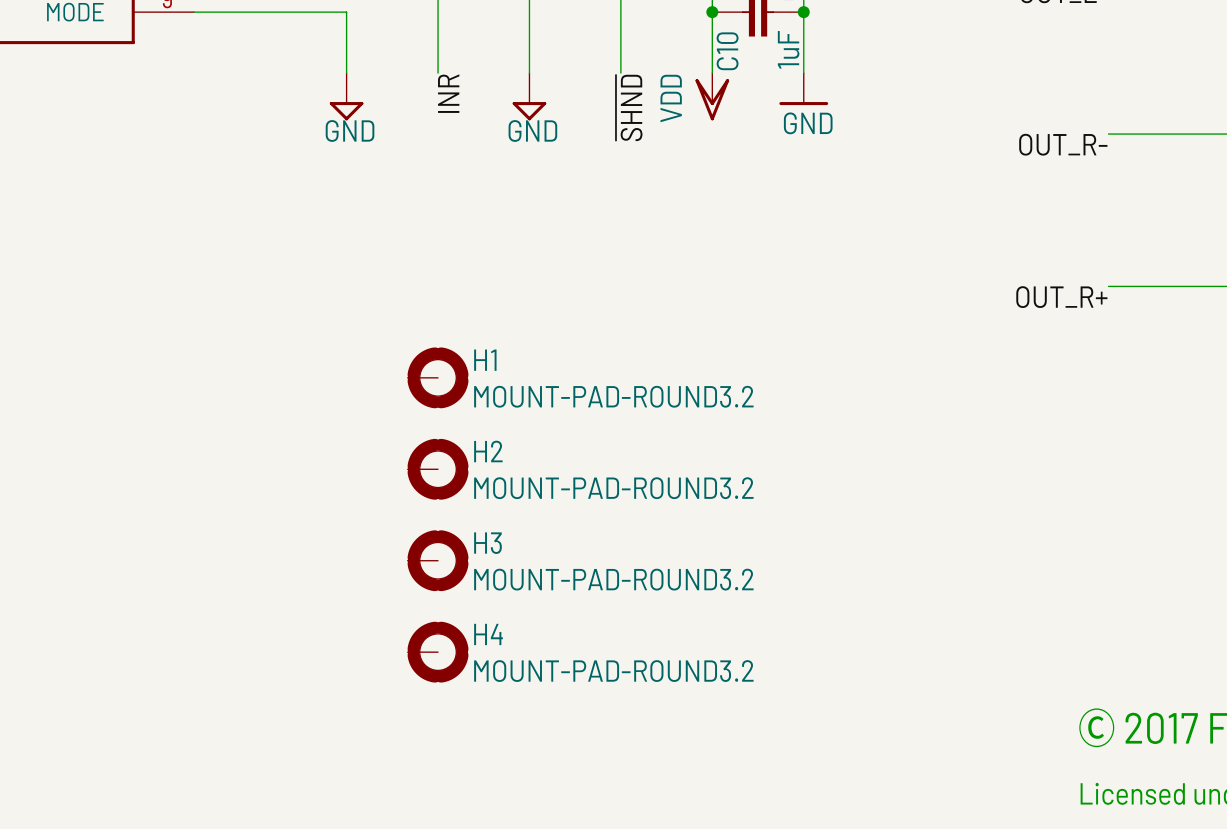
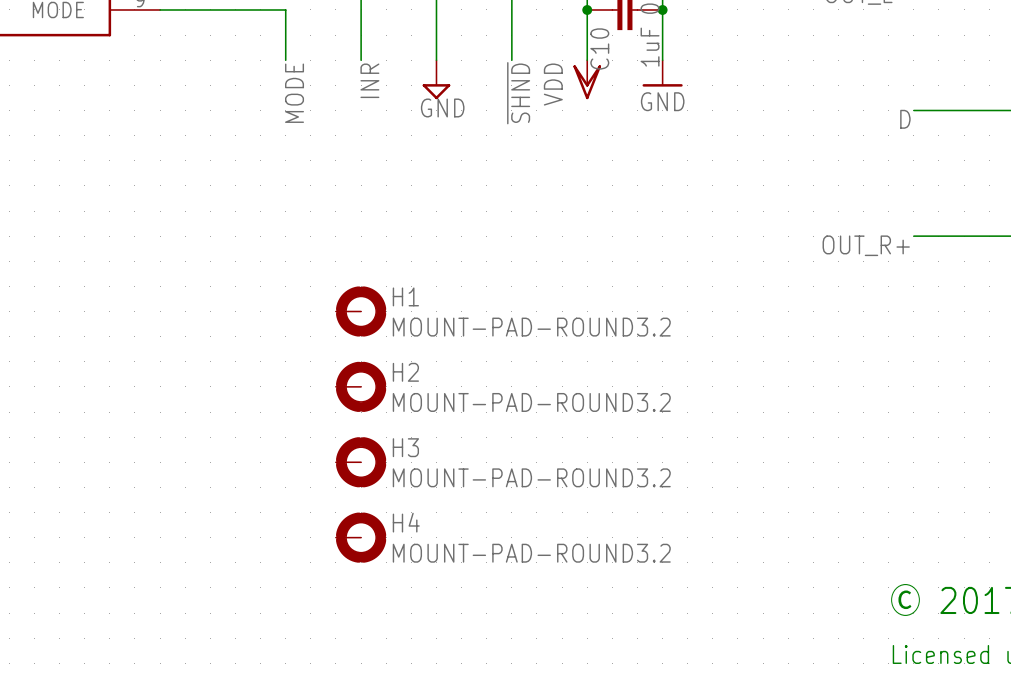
power symbol: GND (346, 96) -> none
label: none -> MODE (294, 93)
label: OUT_R- (1063, 144) -> D (905, 119)

